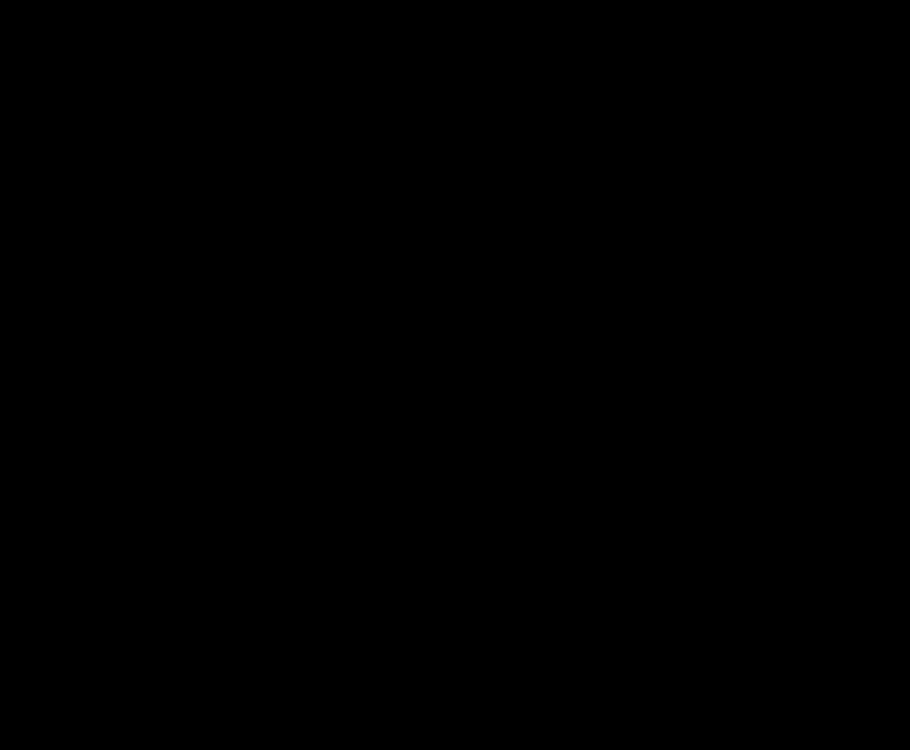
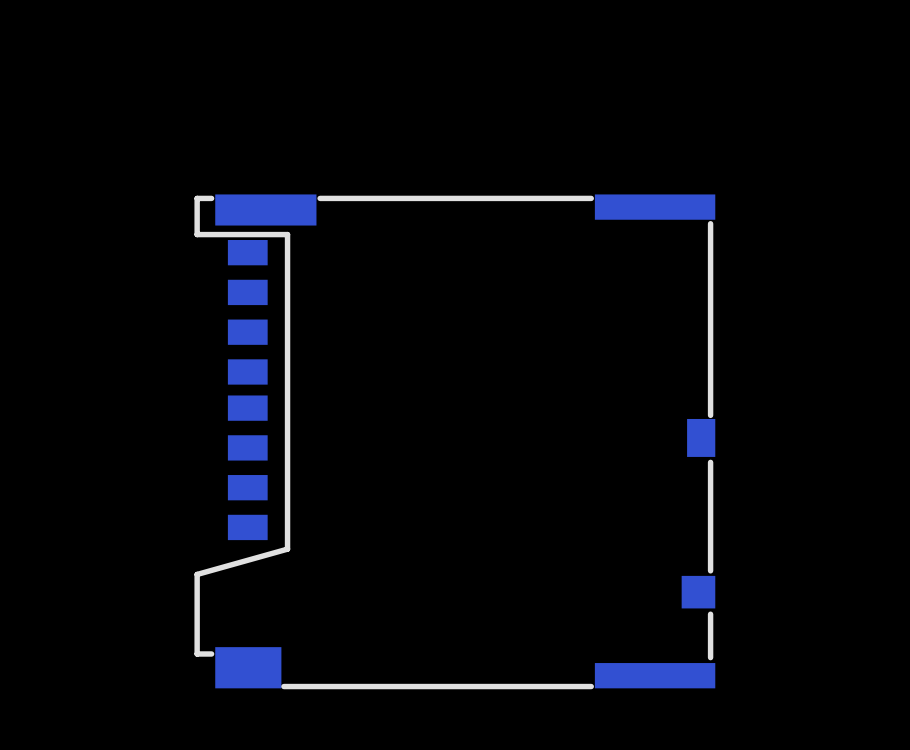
part: none -> (454, 441)

